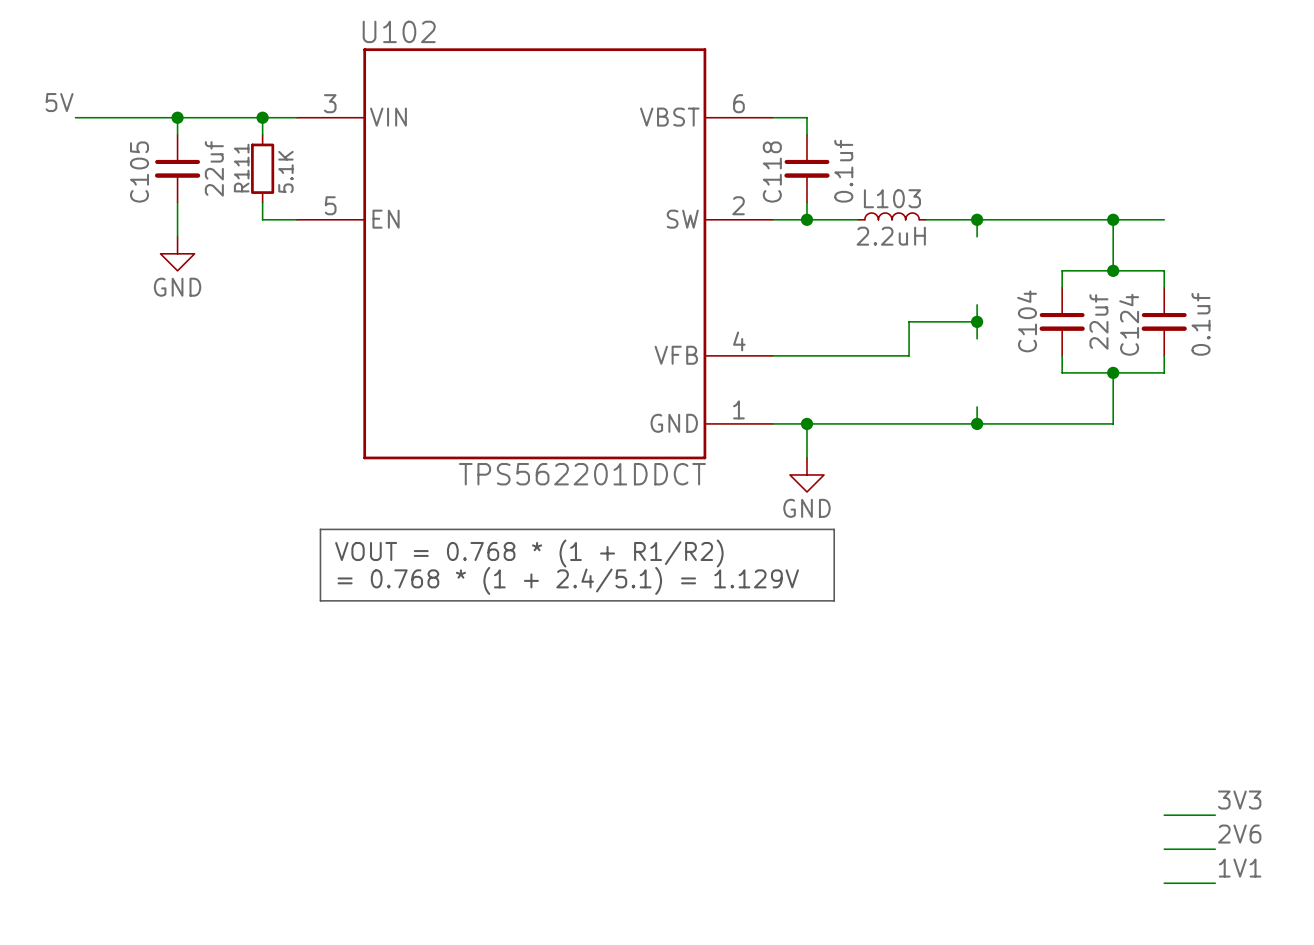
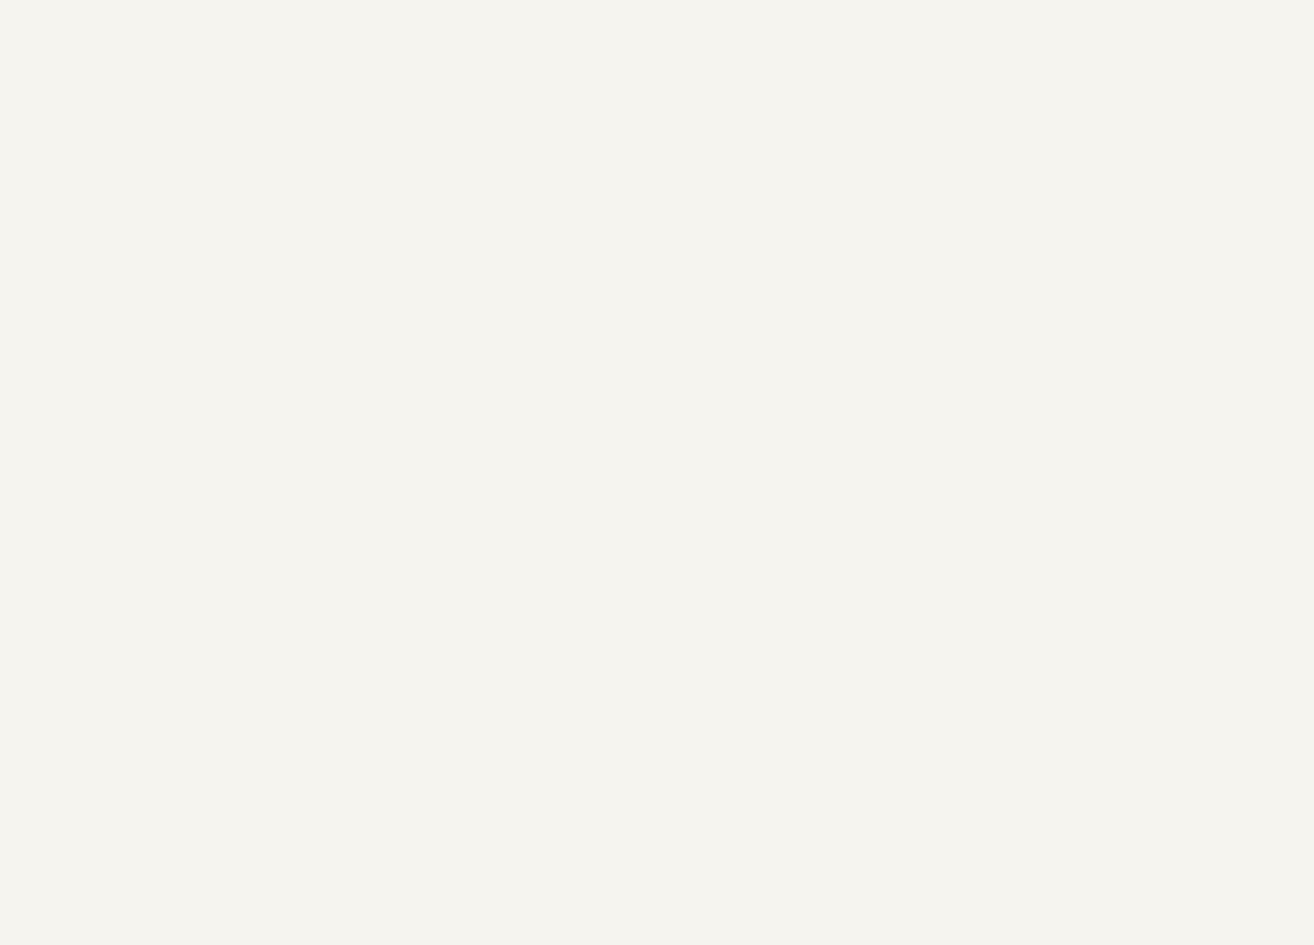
label: 5V (59, 102) -> none
wire: (75, 117) (296, 117) -> none
wire: (177, 117) (177, 134) -> none
junction: (177, 117) -> none
wire: (262, 117) (262, 134) -> none
junction: (262, 117) -> none
wire: (772, 117) (806, 117) (806, 134) -> none
C105: 22uf (177, 168) -> none
R111: 5.1K (262, 168) -> none
C118: 0.1uf (806, 168) -> none
wire: (177, 202) (177, 236) -> none
wire: (262, 202) (262, 219) (296, 219) -> none
wire: (806, 202) (806, 219) -> none
L103: 2.2uH (892, 216) -> none
wire: (772, 219) (858, 219) -> none
junction: (806, 219) -> none
wire: (926, 219) (1164, 219) -> none
wire: (977, 219) (977, 236) -> none
junction: (977, 219) -> none
wire: (1113, 219) (1113, 270) -> none
junction: (1113, 219) -> none
power symbol: GND (177, 253) -> none
U102: TPS562201DDCT (534, 253) -> none
junction: (1113, 270) -> none
wire: (1062, 287) (1062, 270) (1164, 270) (1164, 287) -> none
wire: (977, 304) (977, 338) -> none
wire: (977, 321) (909, 321) (909, 355) (772, 355) -> none
junction: (977, 321) -> none
C104: 22uf (1062, 321) -> none
C124: 0.1uf (1164, 321) -> none
wire: (1062, 355) (1062, 372) (1164, 372) (1164, 355) -> none
wire: (1113, 372) (1113, 423) (772, 423) -> none
junction: (1113, 372) -> none
wire: (977, 406) (977, 423) -> none
wire: (806, 423) (806, 457) -> none
junction: (806, 423) -> none
junction: (977, 423) -> none
power symbol: GND (806, 474) -> none
line: (320, 529) (834, 529) (834, 600) (320, 600) (320, 529) -> none
text: VOUT = 0.768 * (1 + R1/R2) (529, 553) -> none
text: = 0.768 * (1 + 2.4/5.1) = 1.129V (568, 580) -> none
label: 3V3 (1239, 800) -> none
wire: (1164, 815) (1215, 815) -> none
label: 2V6 (1239, 834) -> none
wire: (1164, 849) (1215, 849) -> none
label: 1V1 (1240, 868) -> none
wire: (1164, 883) (1215, 883) -> none

